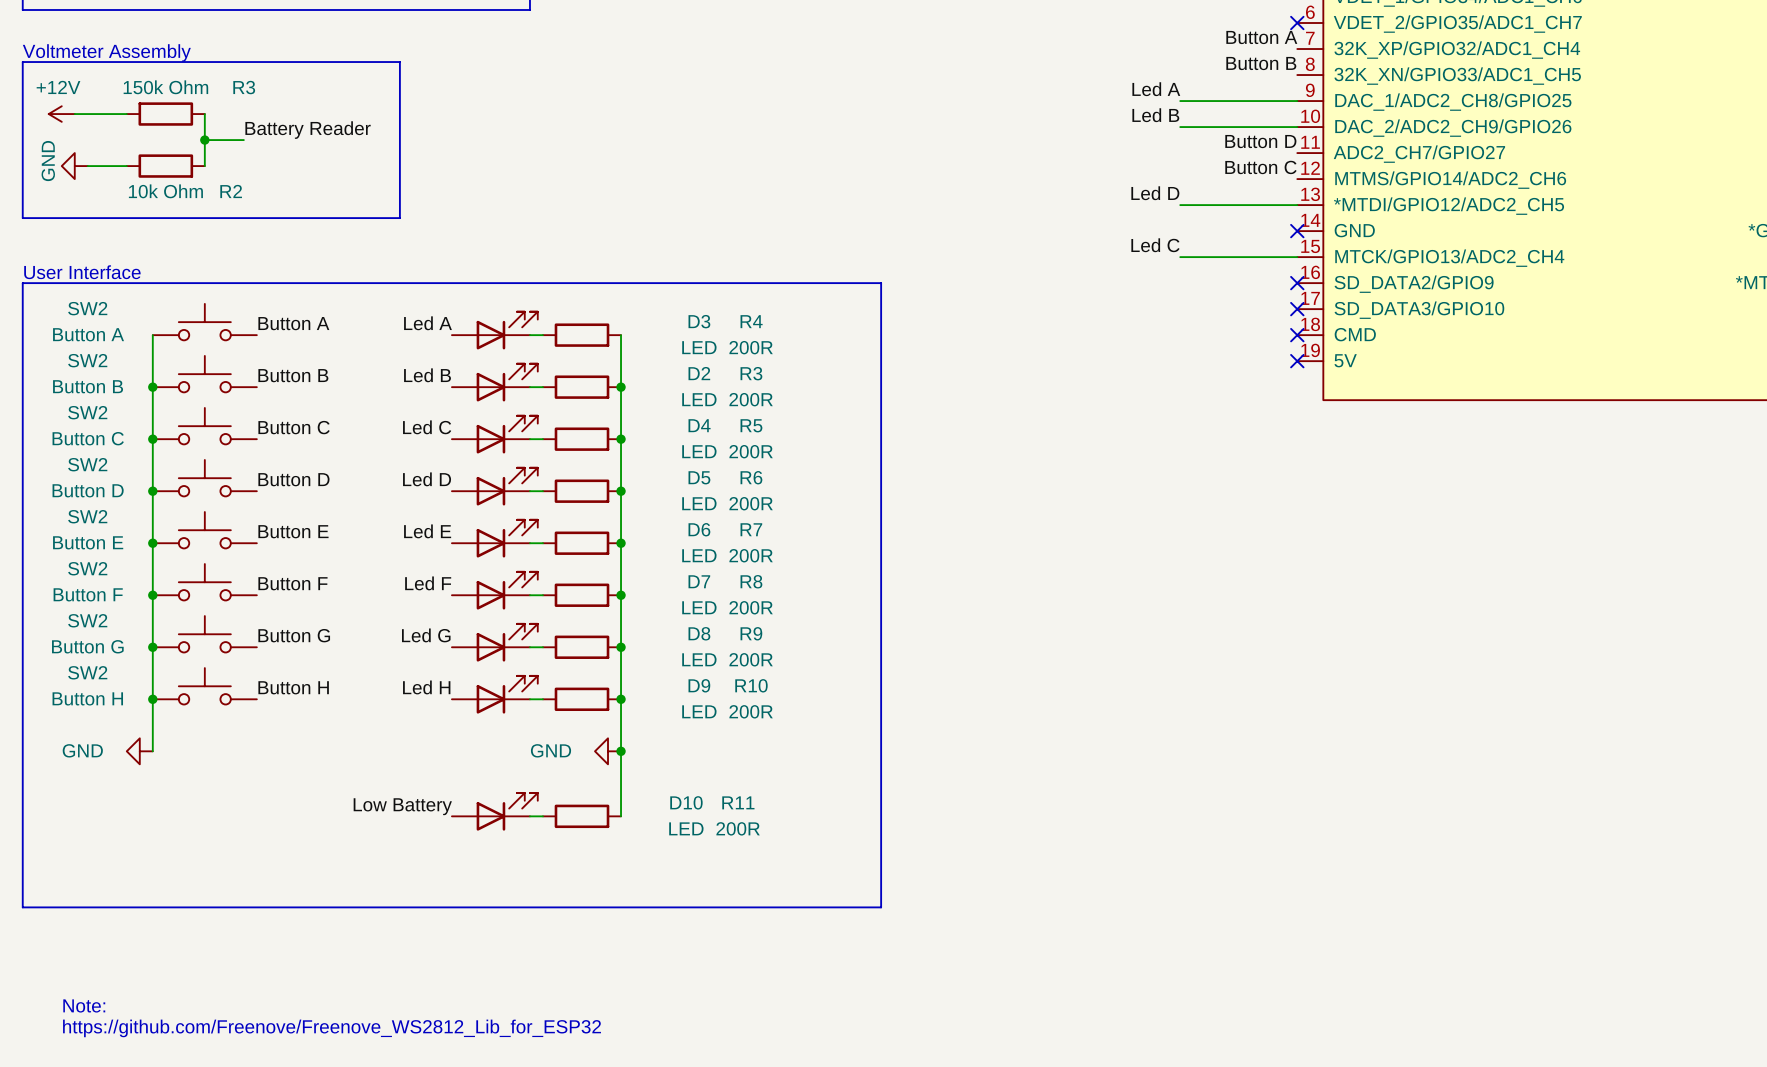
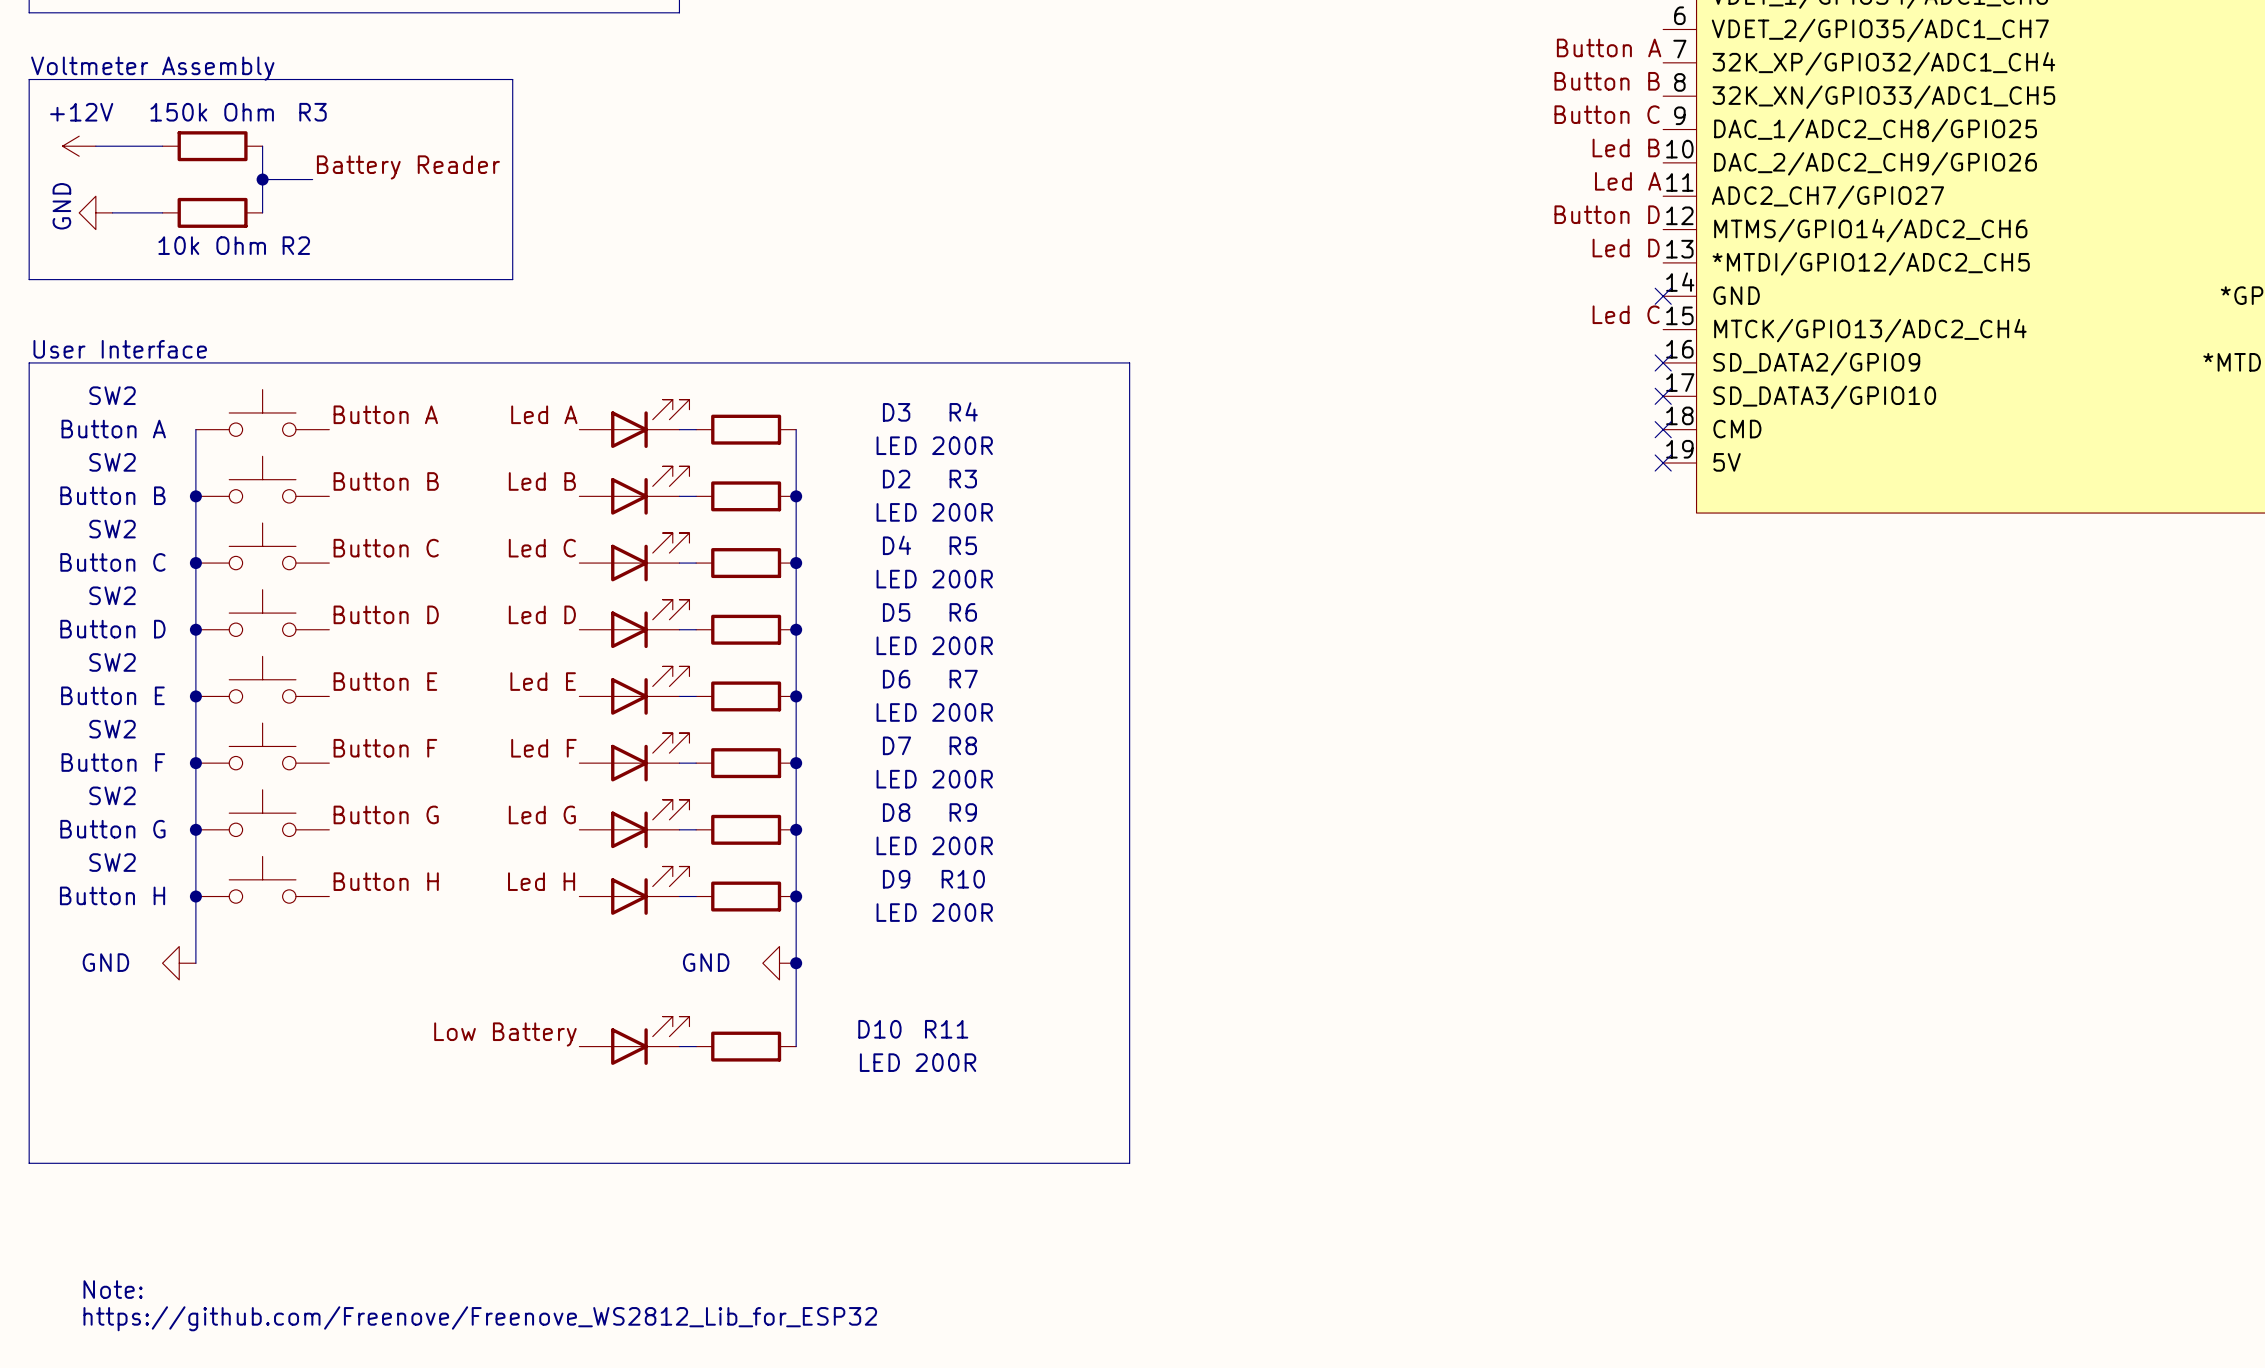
no-connect mark: (1297, 23) -> none
label: Led A (1156, 89) -> none
label: none -> Button C (1607, 114)
wire: (1180, 101) (1297, 101) -> none
label position: Led B (1155, 115) -> Led B (1626, 148)
wire: (1180, 127) (1297, 127) -> none
label: Button D (1260, 141) -> Led A (1628, 181)
label: Button C (1260, 167) -> Button D (1607, 214)
label position: Led D (1155, 193) -> Led D (1626, 248)
wire: (1180, 205) (1297, 205) -> none
label position: Led C (1155, 245) -> Led C (1626, 314)
wire: (1180, 257) (1297, 257) -> none

